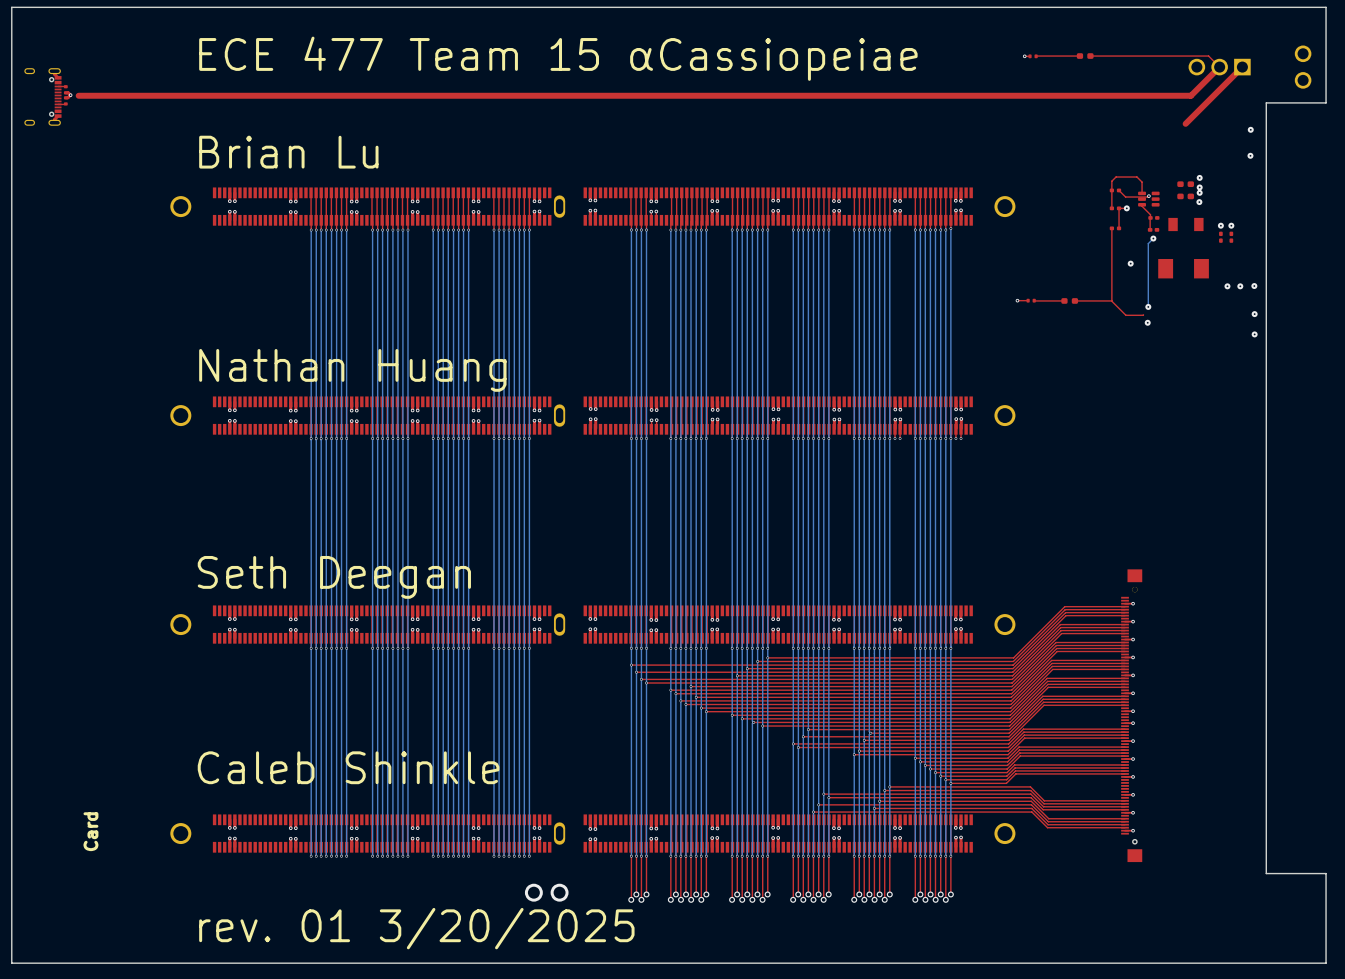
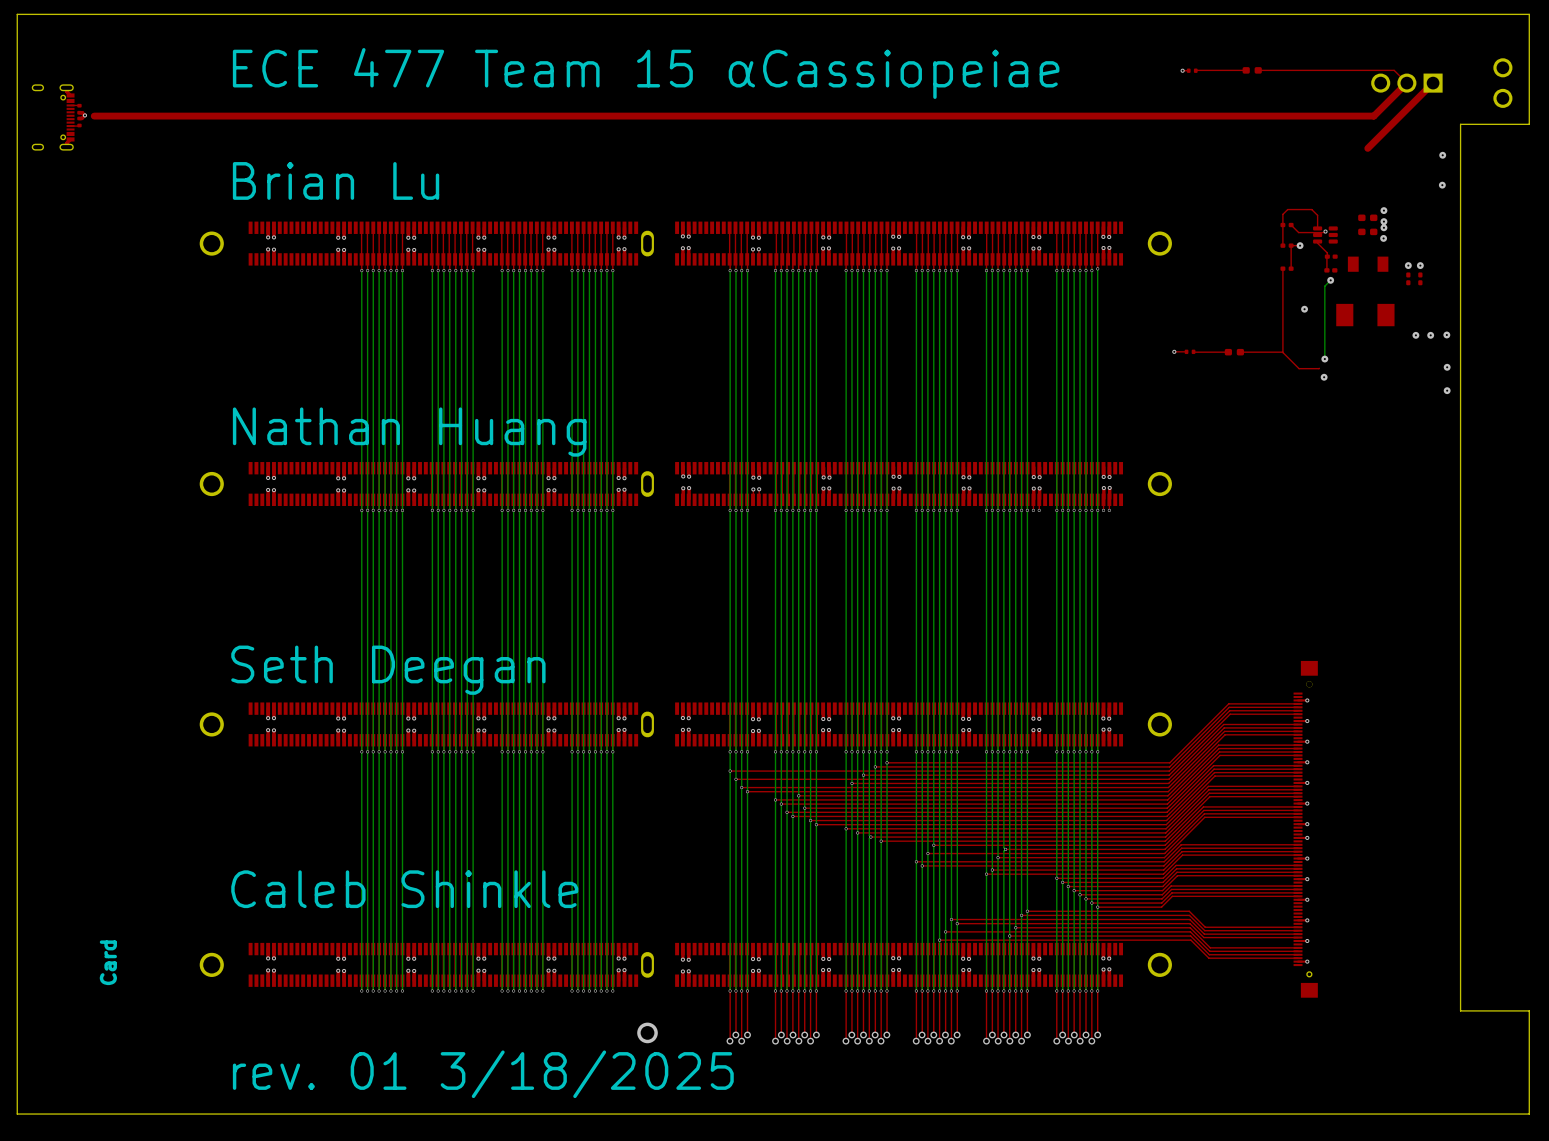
via: (533, 892) -> none
text: rev. 01 3/20/2025 (416, 928) -> rev. 01 3/18/2025 (483, 1074)

